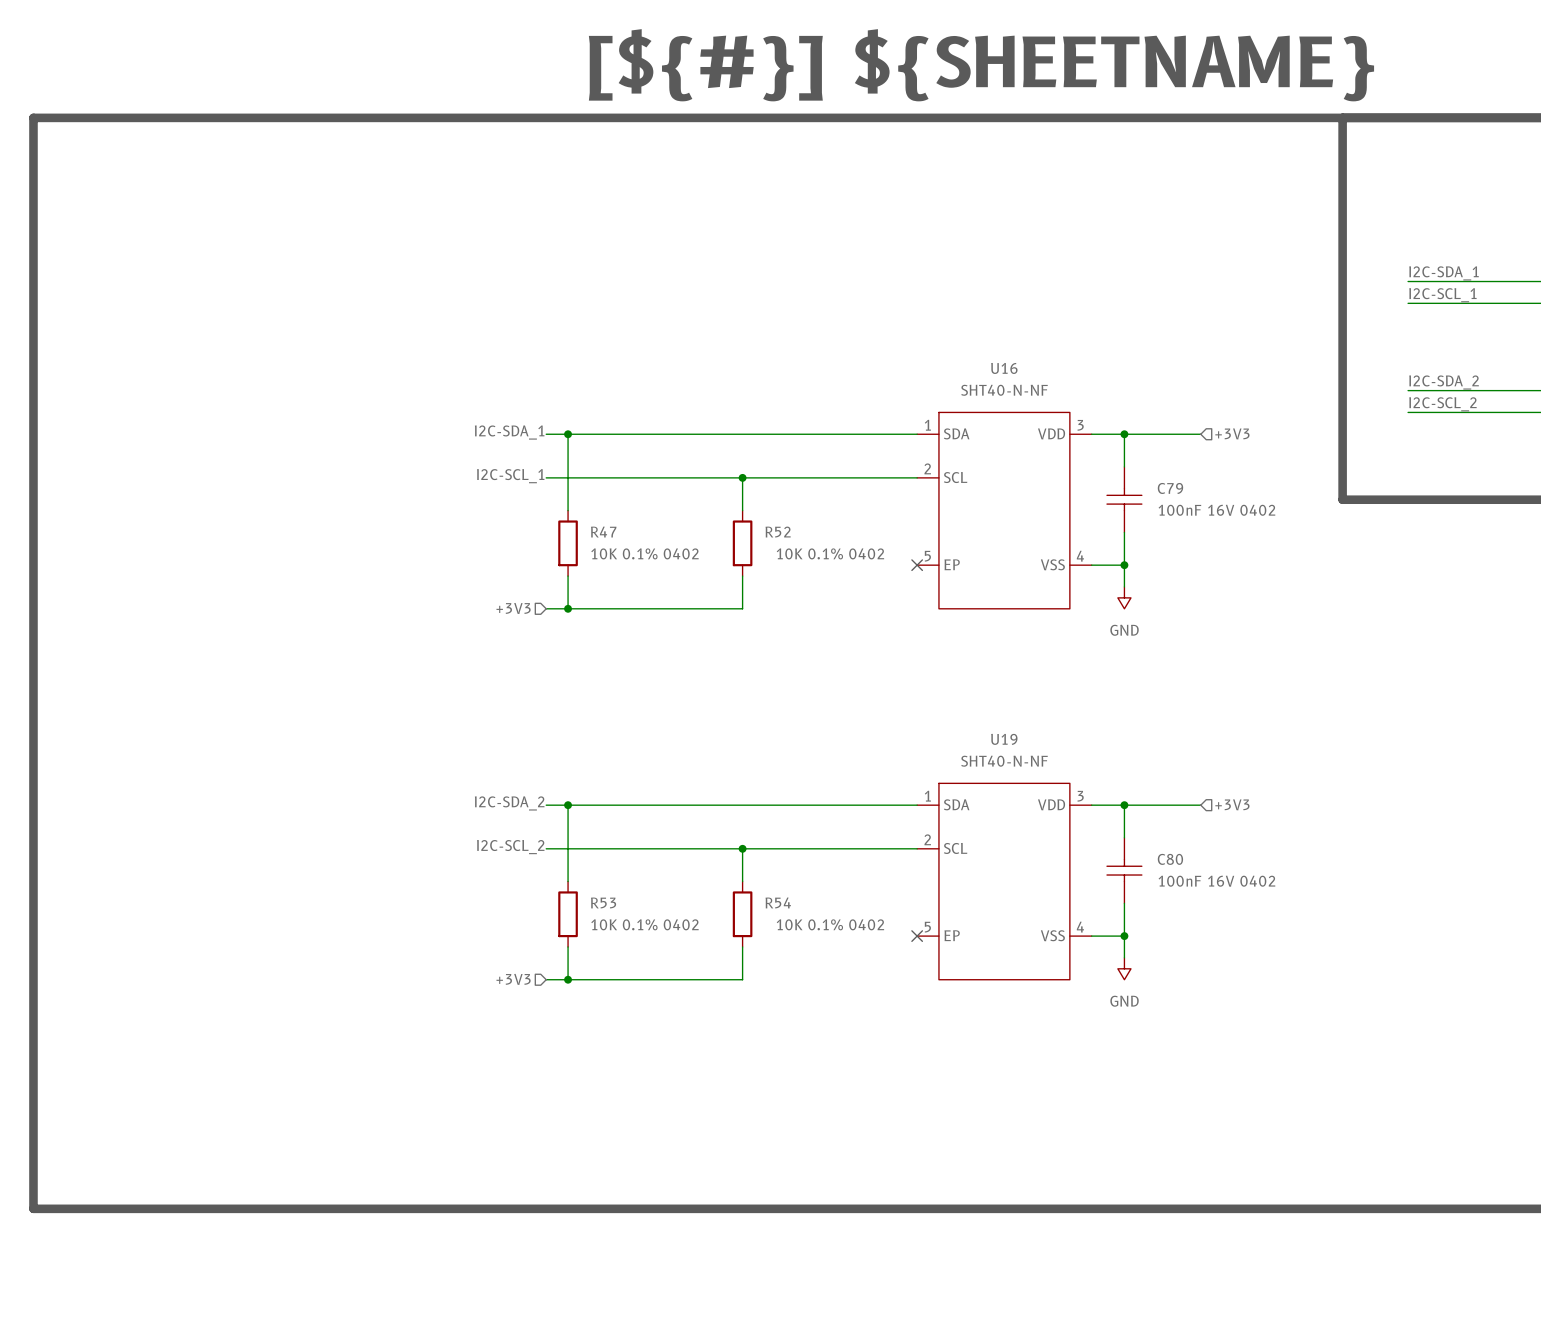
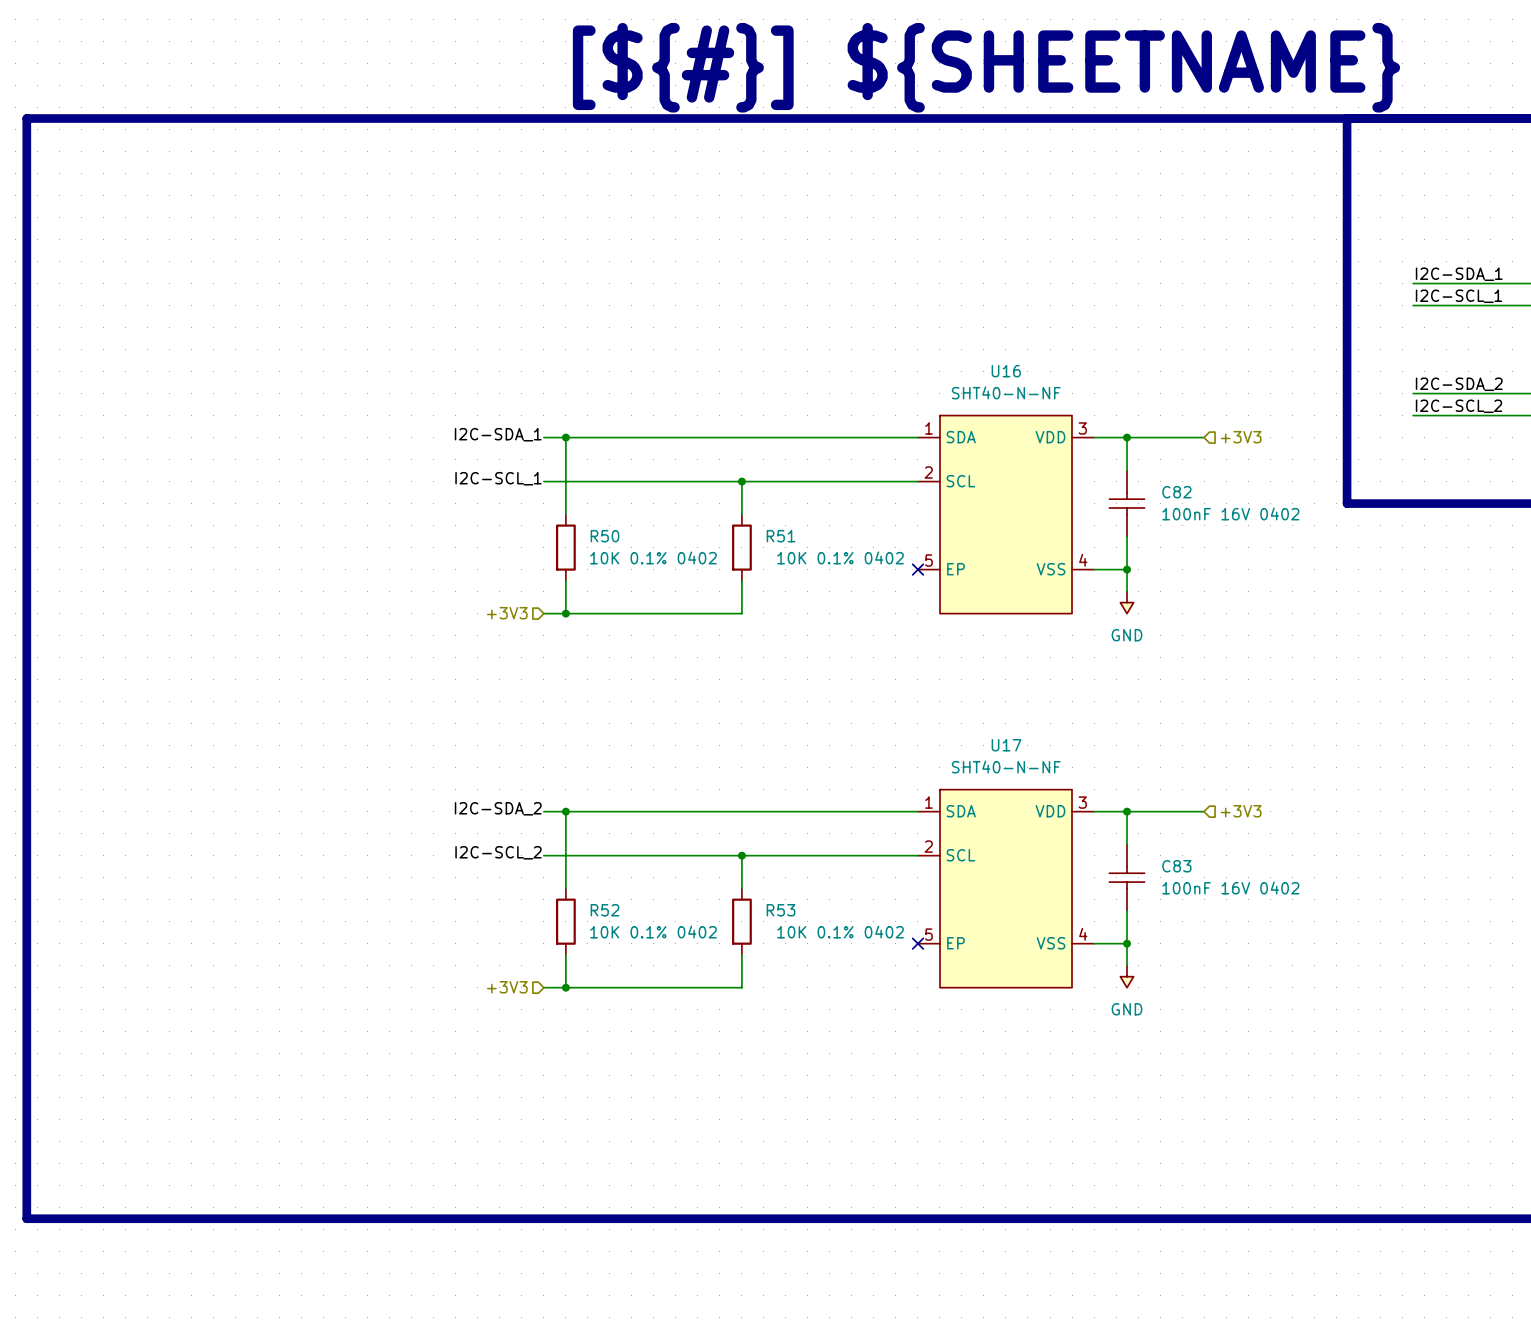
C79 name: C79 (1170, 488) -> C82 (1176, 492)
R47 name: R47 (603, 532) -> R50 (605, 536)
R52 name: R52 (778, 532) -> R51 (781, 536)
U19 name: U19 (1004, 739) -> U17 (1006, 745)
C80 name: C80 (1170, 859) -> C83 (1176, 866)
R53 name: R53 (603, 902) -> R52 (605, 910)
R54 name: R54 (778, 902) -> R53 (781, 910)

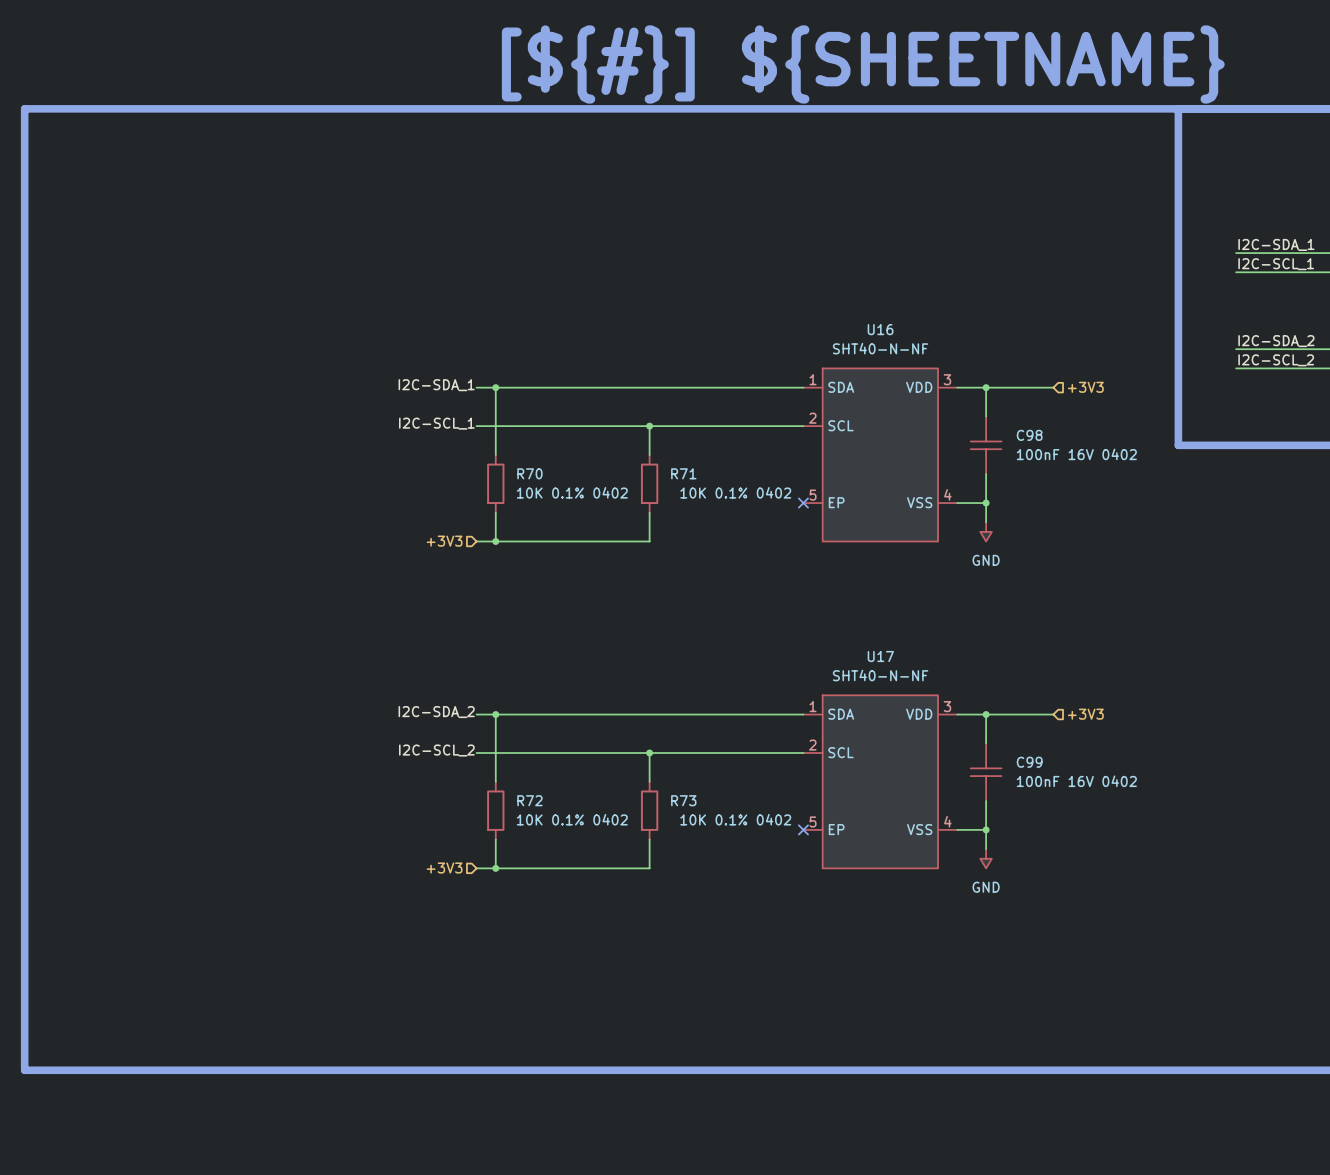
C82 name: C82 (1176, 492) -> C98 (1029, 435)
R50 name: R50 (605, 536) -> R70 (529, 473)
R51 name: R51 (781, 536) -> R71 (683, 473)
C83 name: C83 (1176, 866) -> C99 (1029, 762)
R52 name: R52 (605, 910) -> R72 (529, 800)
R53 name: R53 (781, 910) -> R73 (683, 800)

